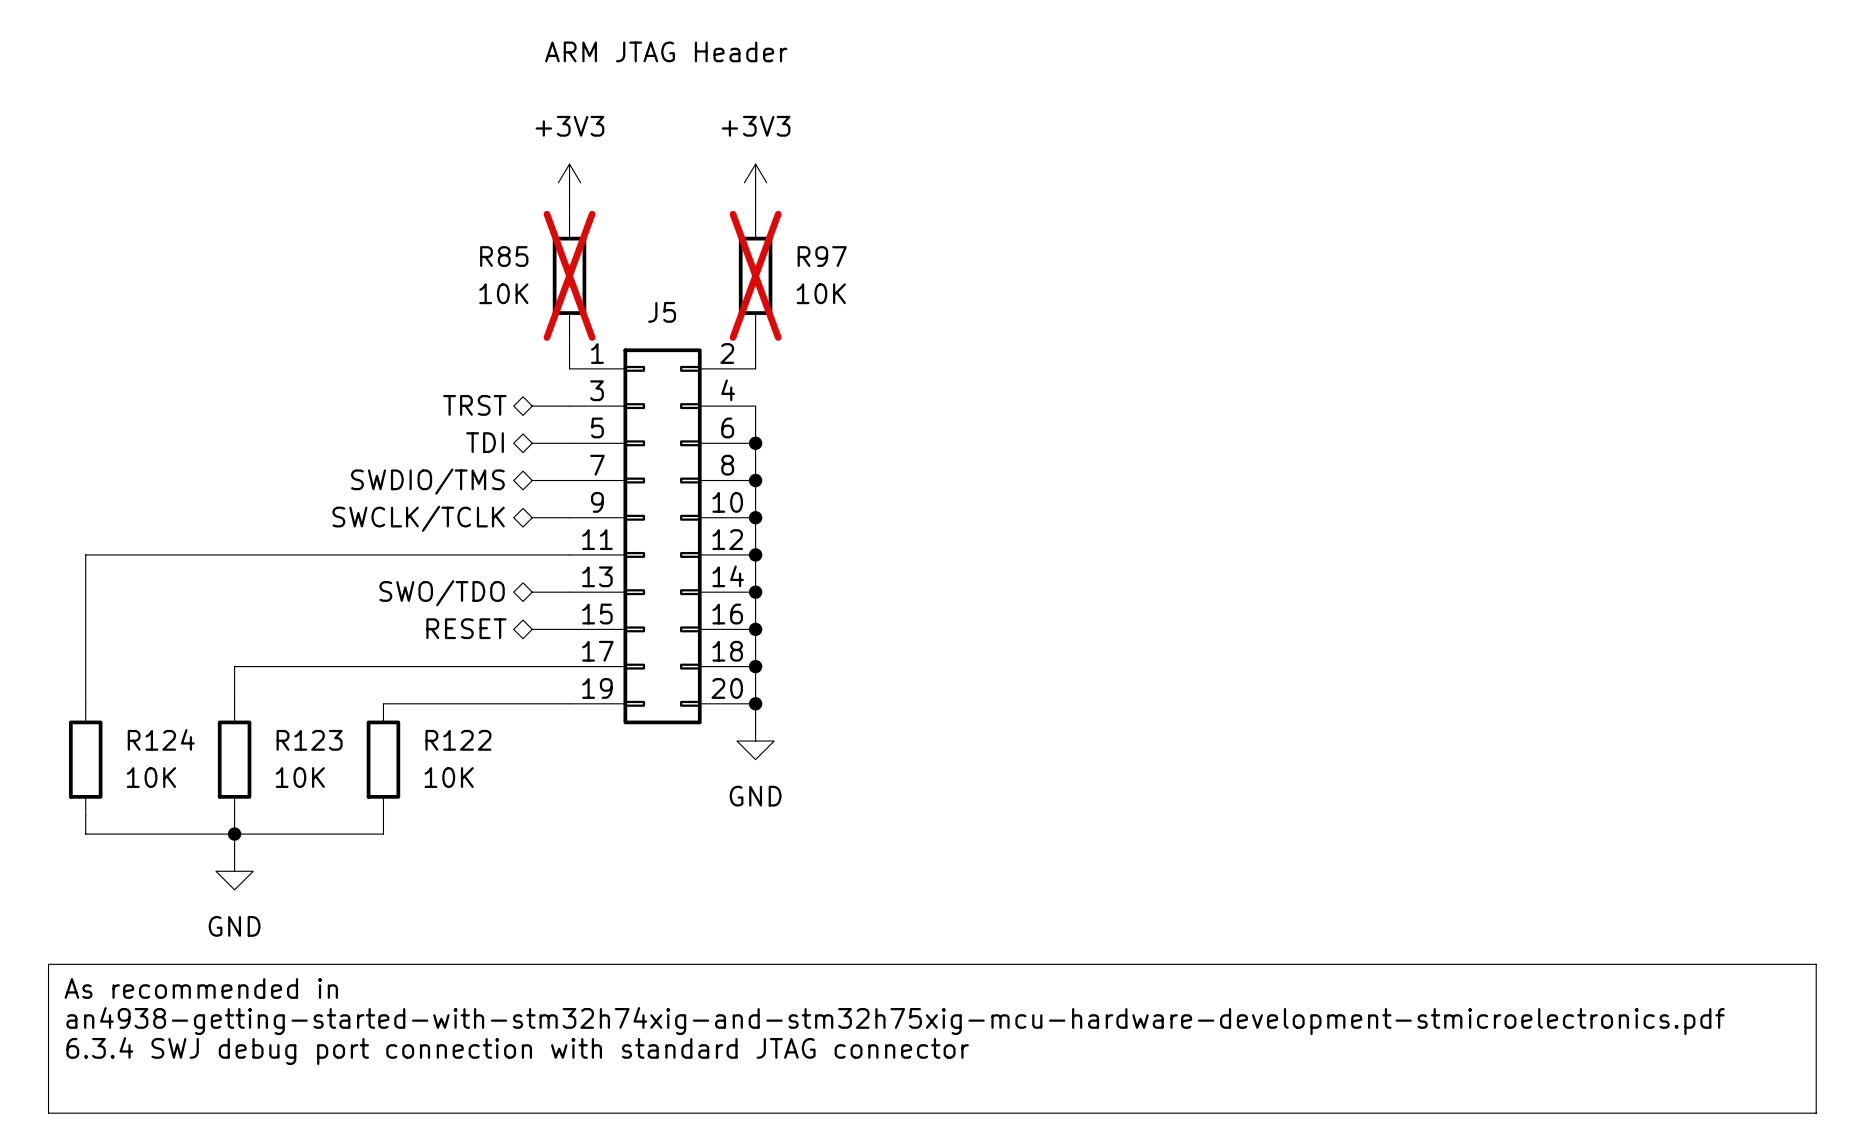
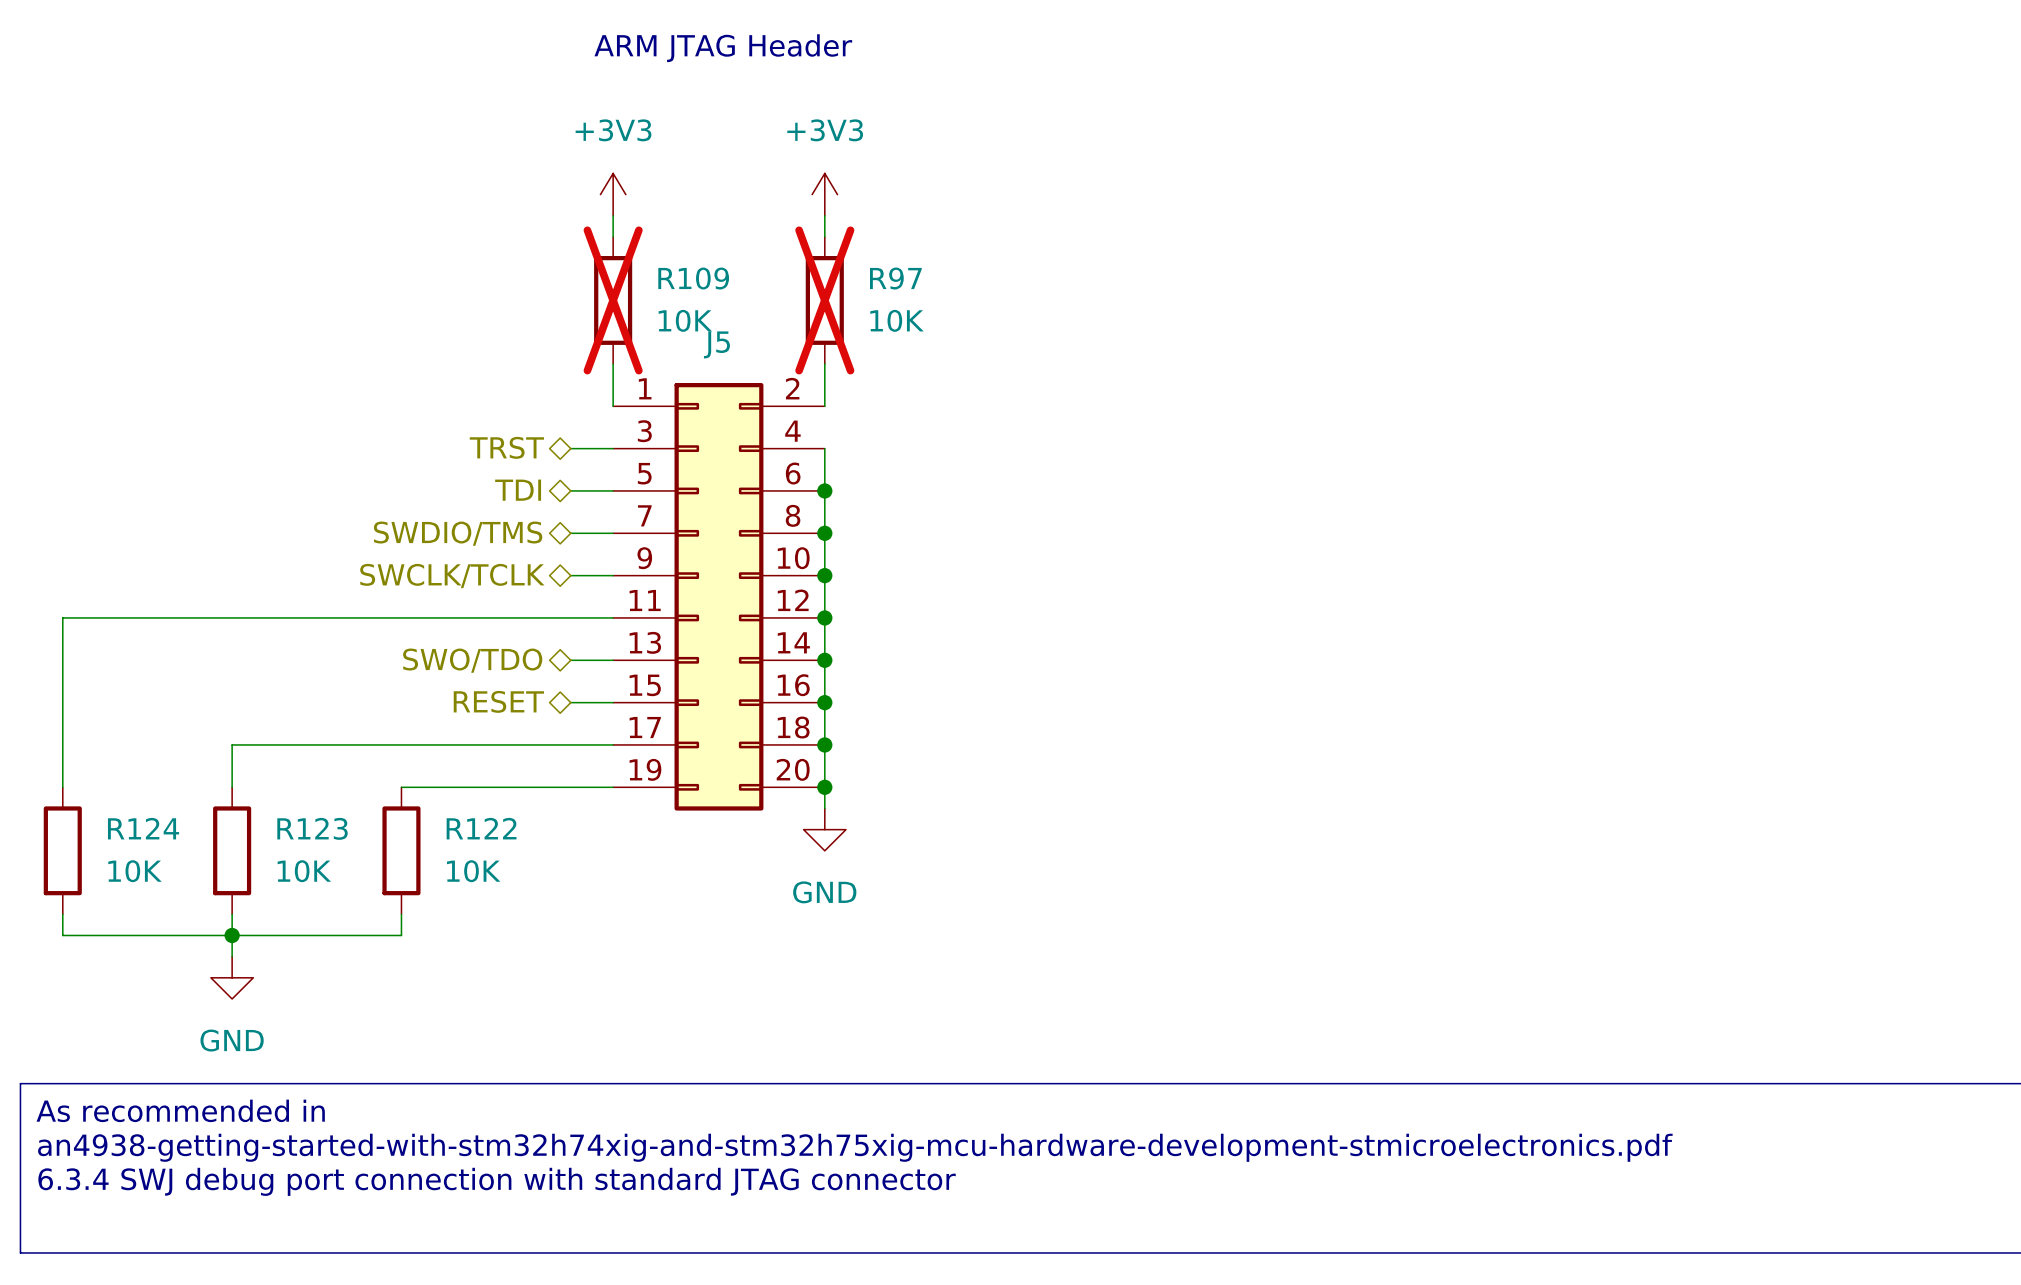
R85 name: R85 (504, 256) -> R109 (693, 278)
R85 value position: 10K (503, 293) -> 10K (685, 320)

